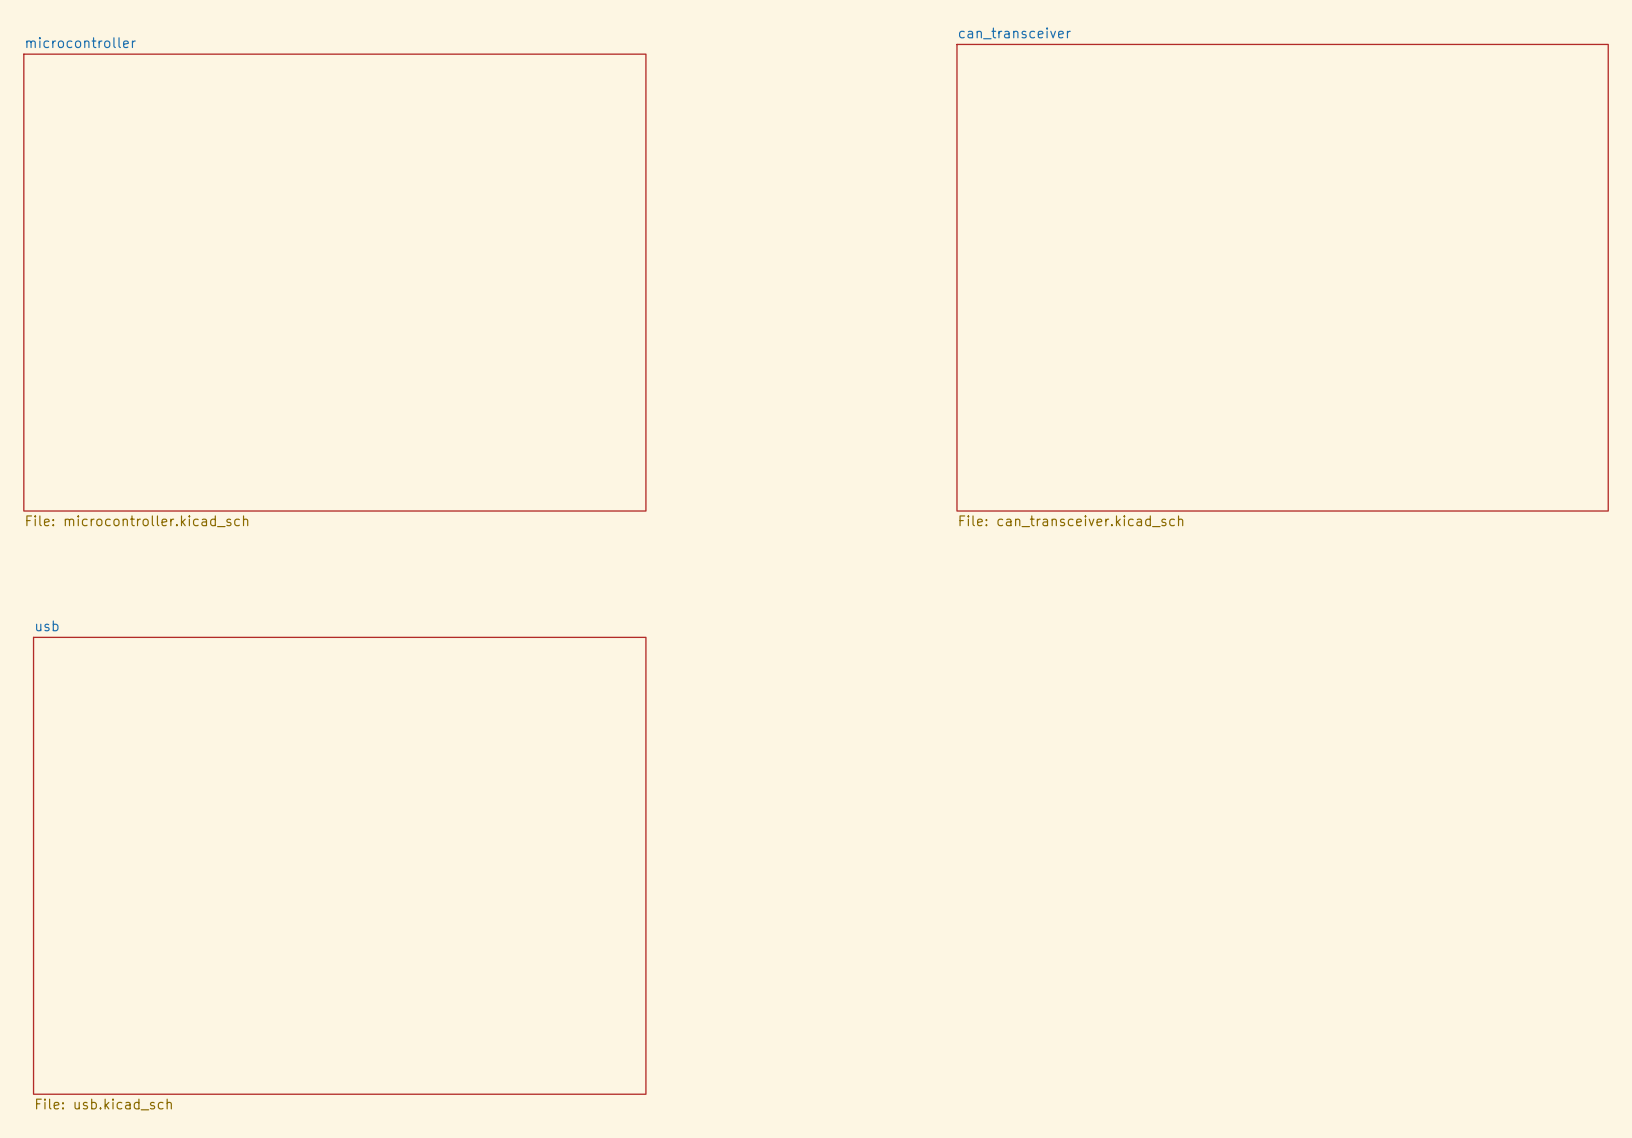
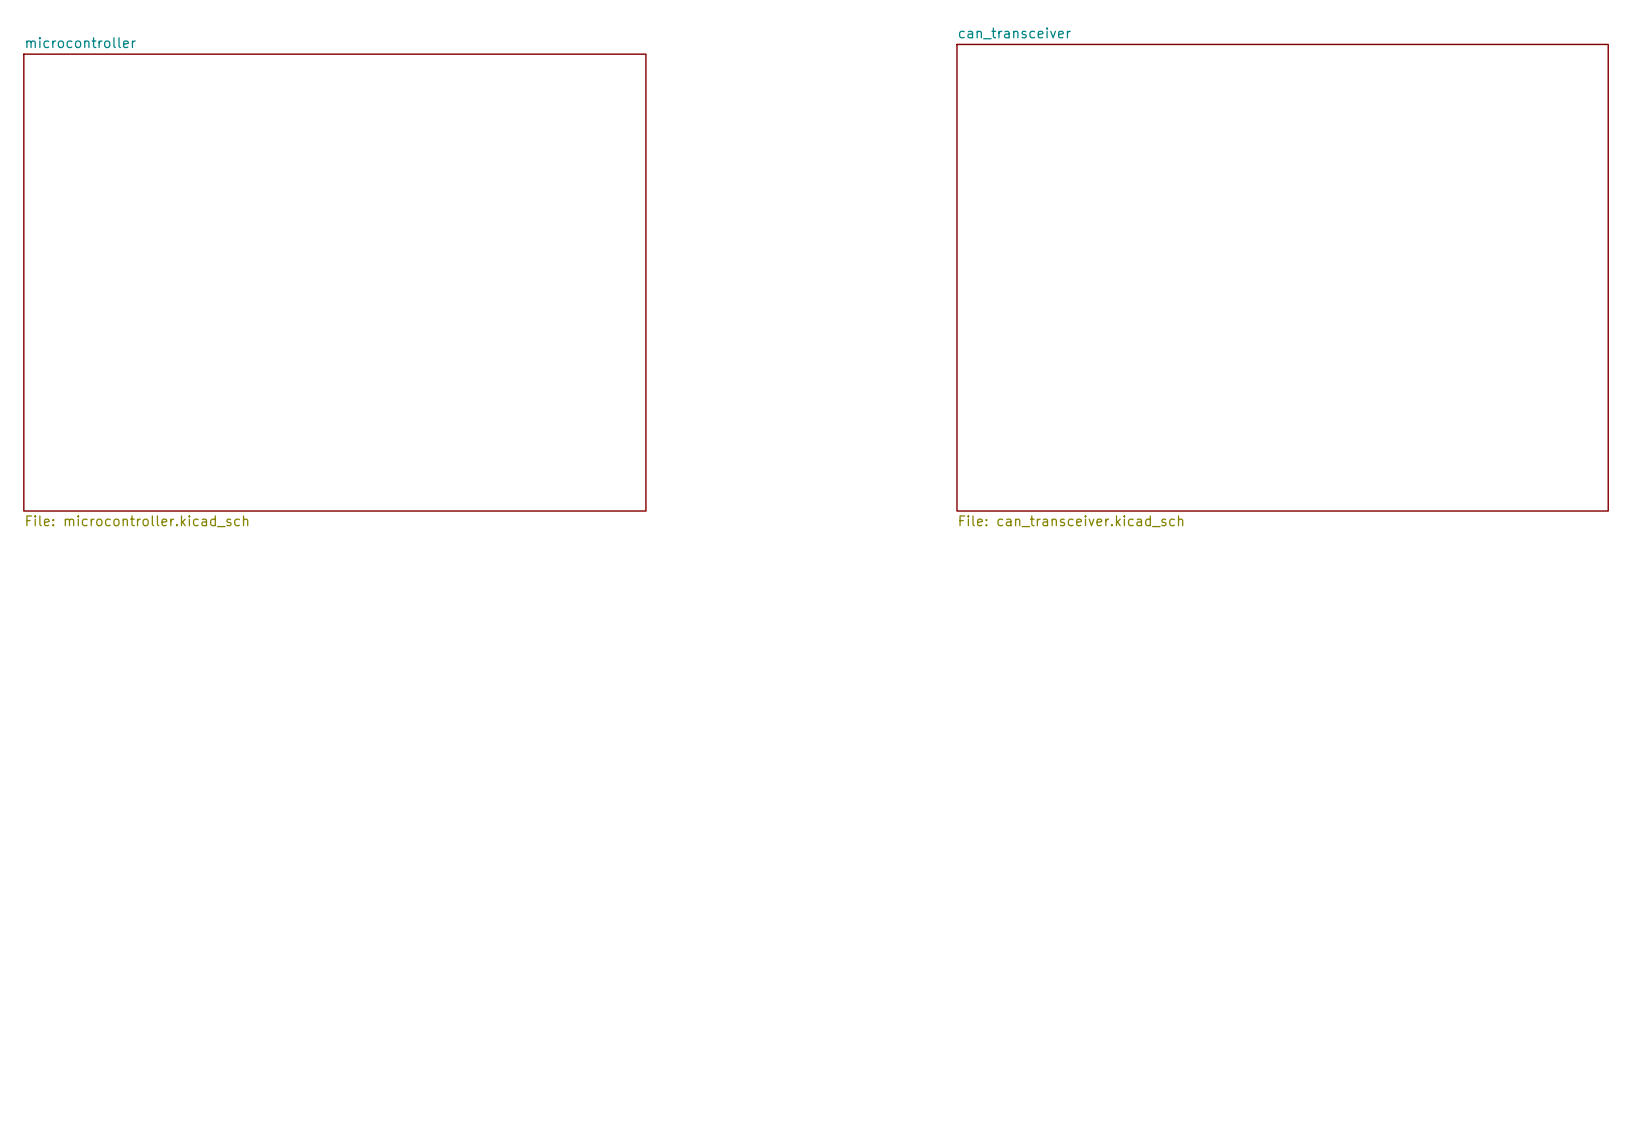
sheet usb: File: usb.kicad_sch (339, 865) -> none

